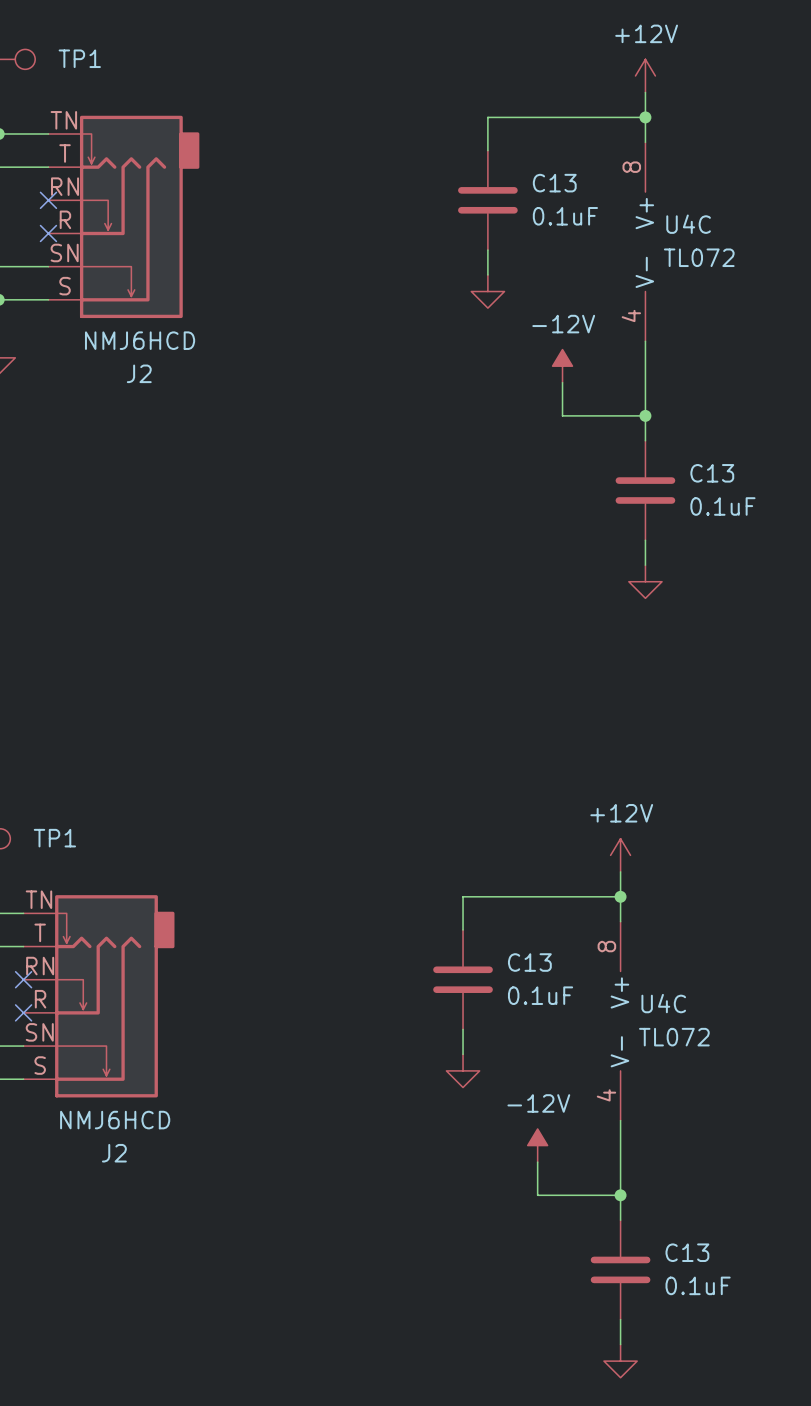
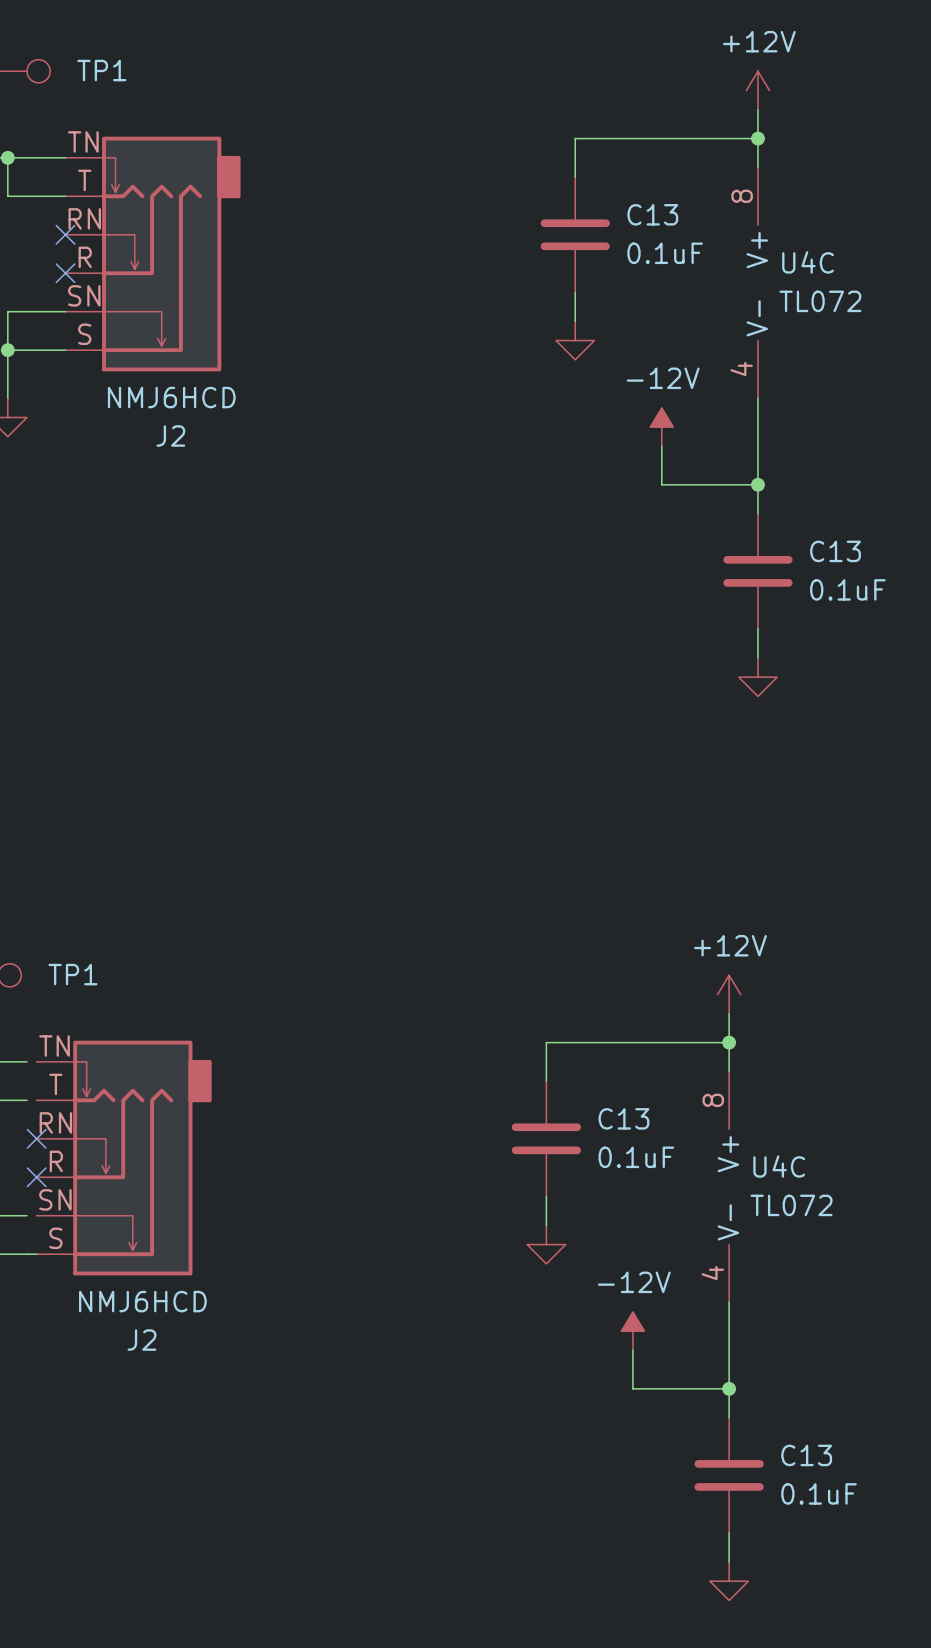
wire: (15, 913) (23, 913) -> none
wire: (15, 946) (23, 946) -> none
wire: (15, 1046) (23, 1046) -> none

